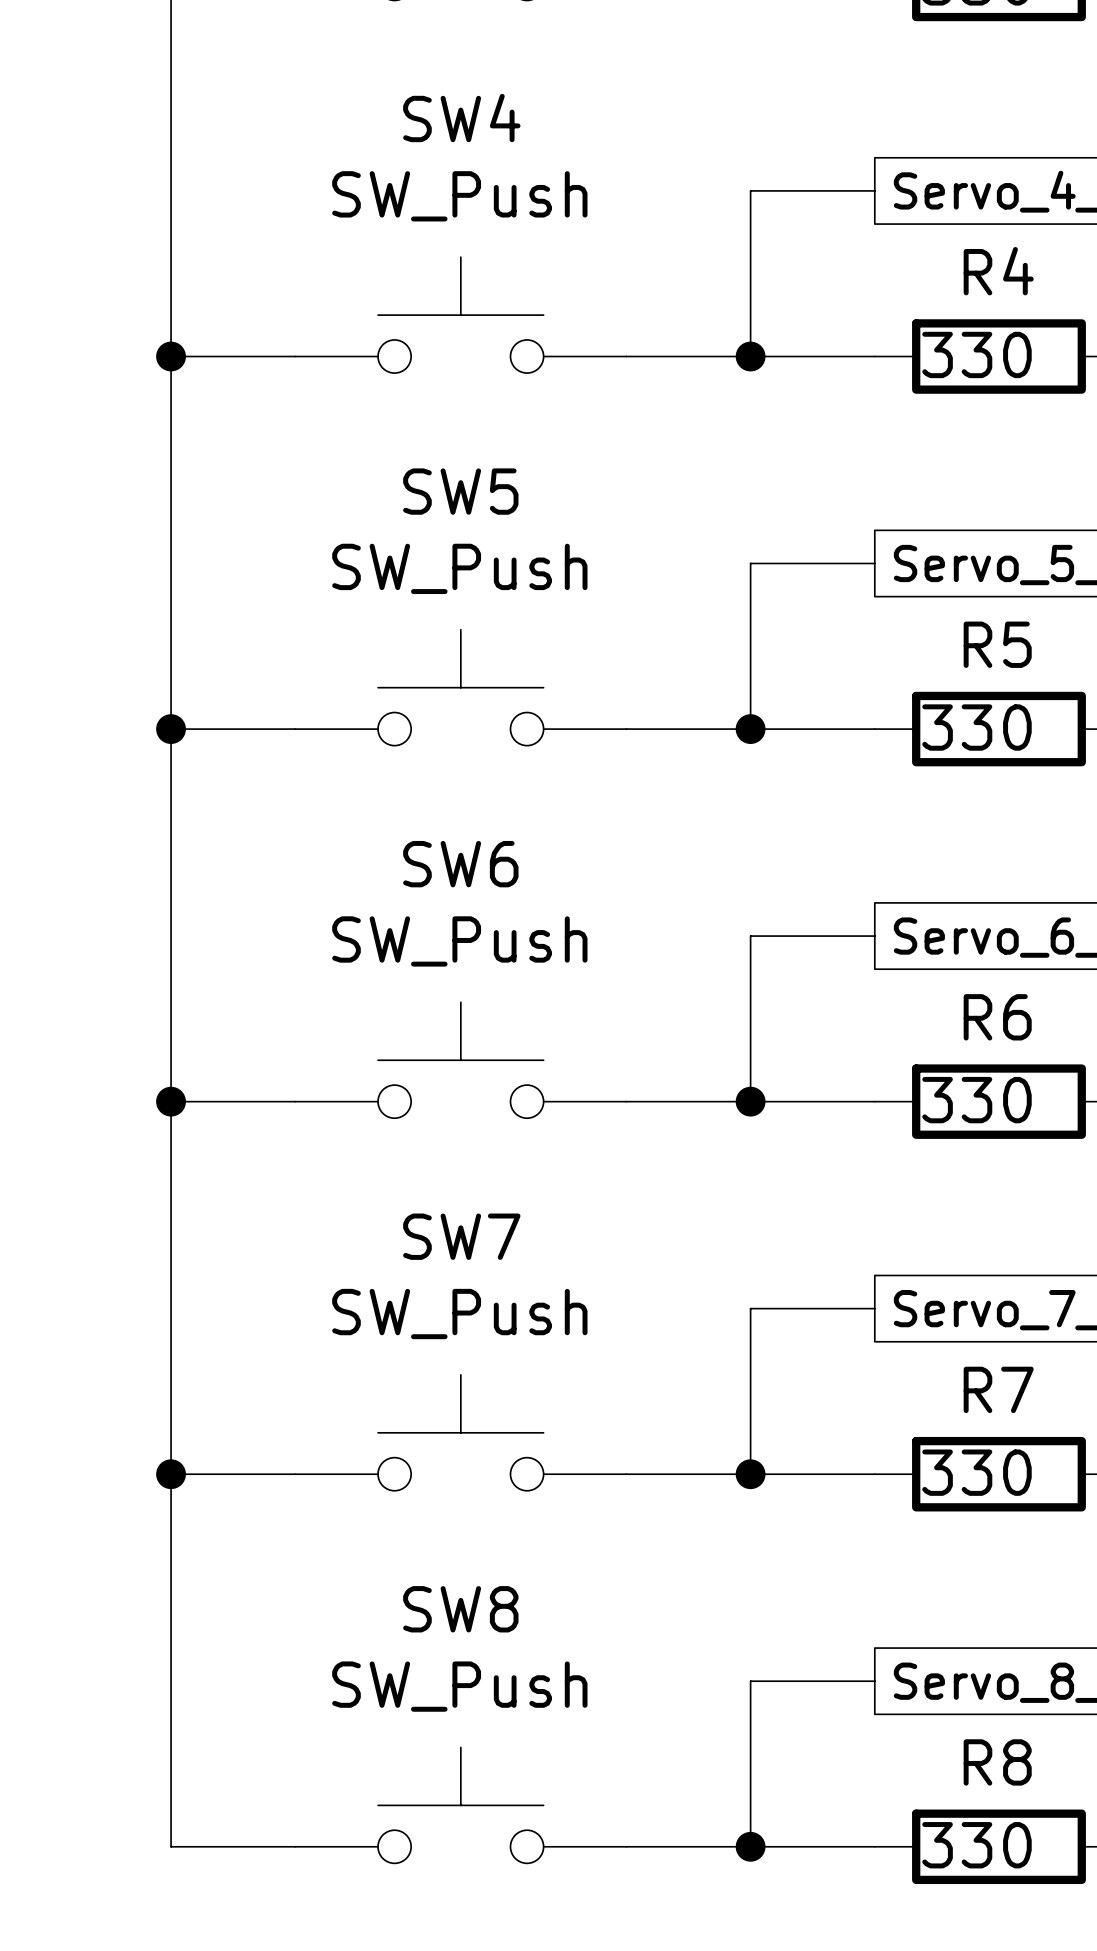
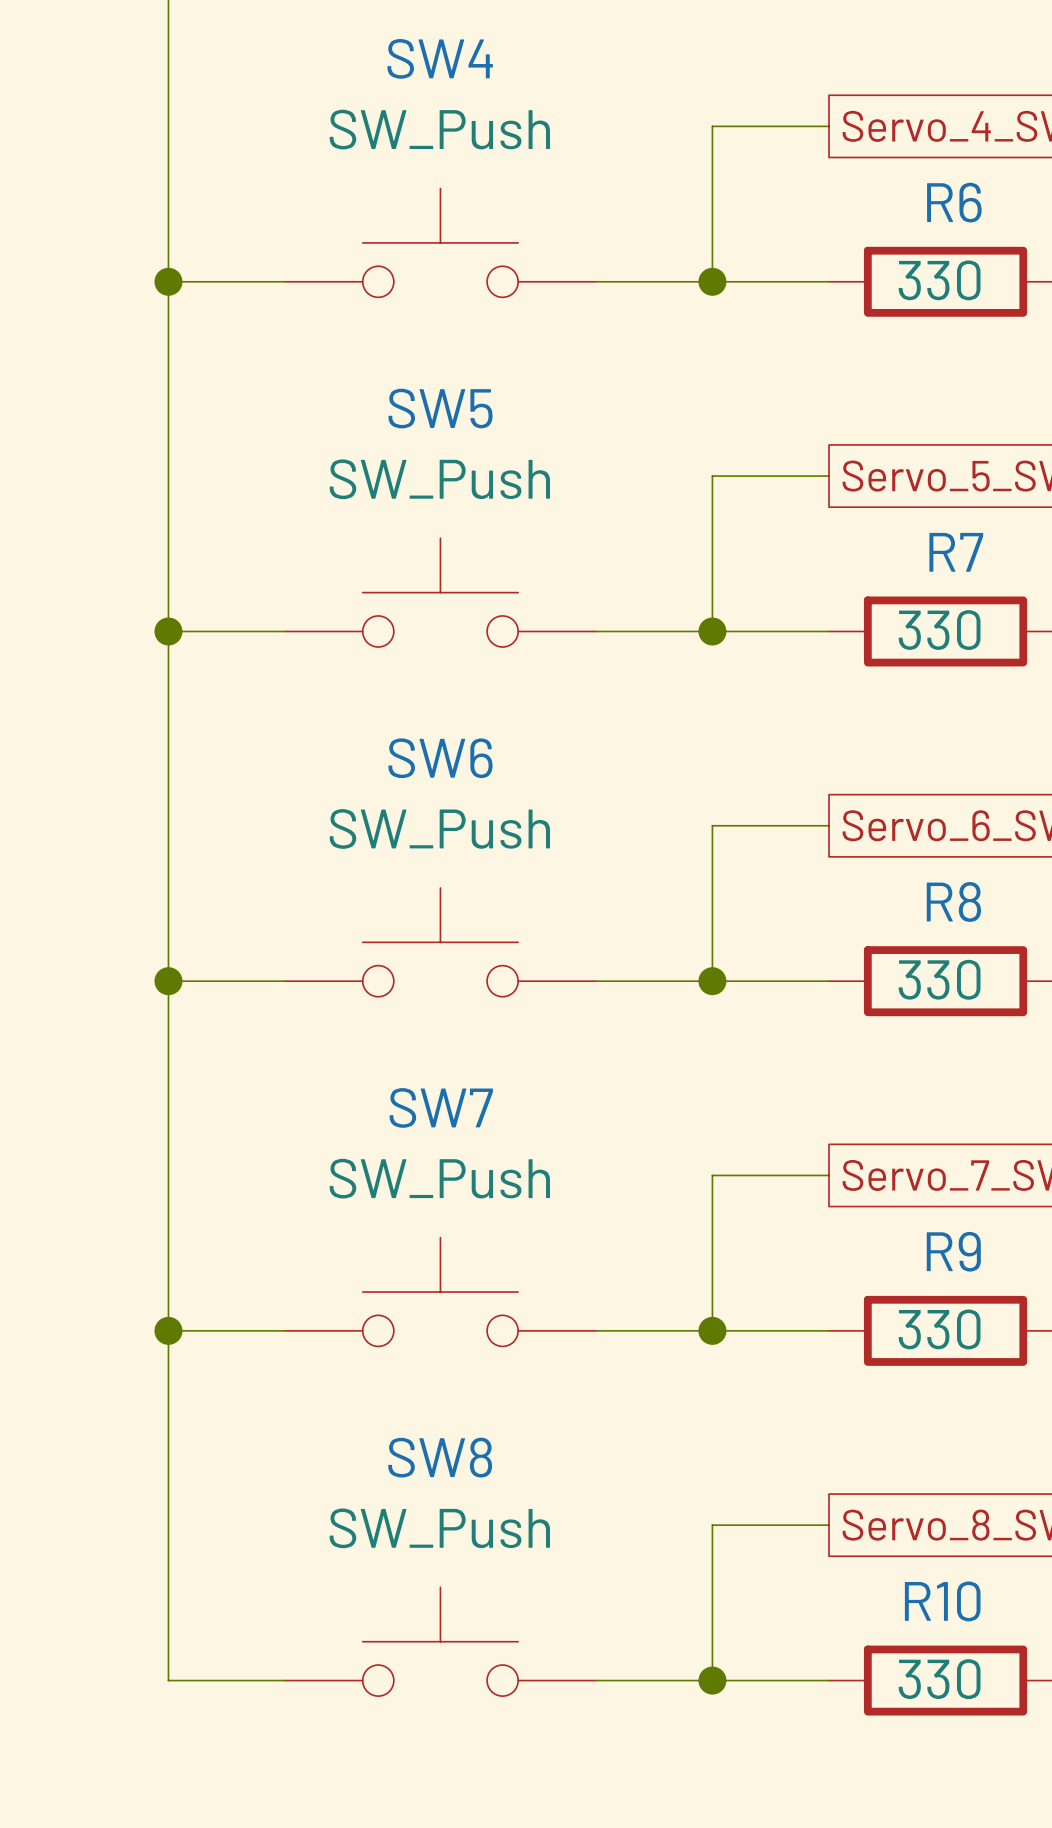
R4 name: R4 (998, 271) -> R6 (954, 202)
R5 name: R5 (997, 644) -> R7 (956, 552)
R6 name: R6 (997, 1017) -> R8 (953, 901)
R7 name: R7 (998, 1389) -> R9 (953, 1251)
R8 name: R8 (997, 1762) -> R10 (942, 1601)

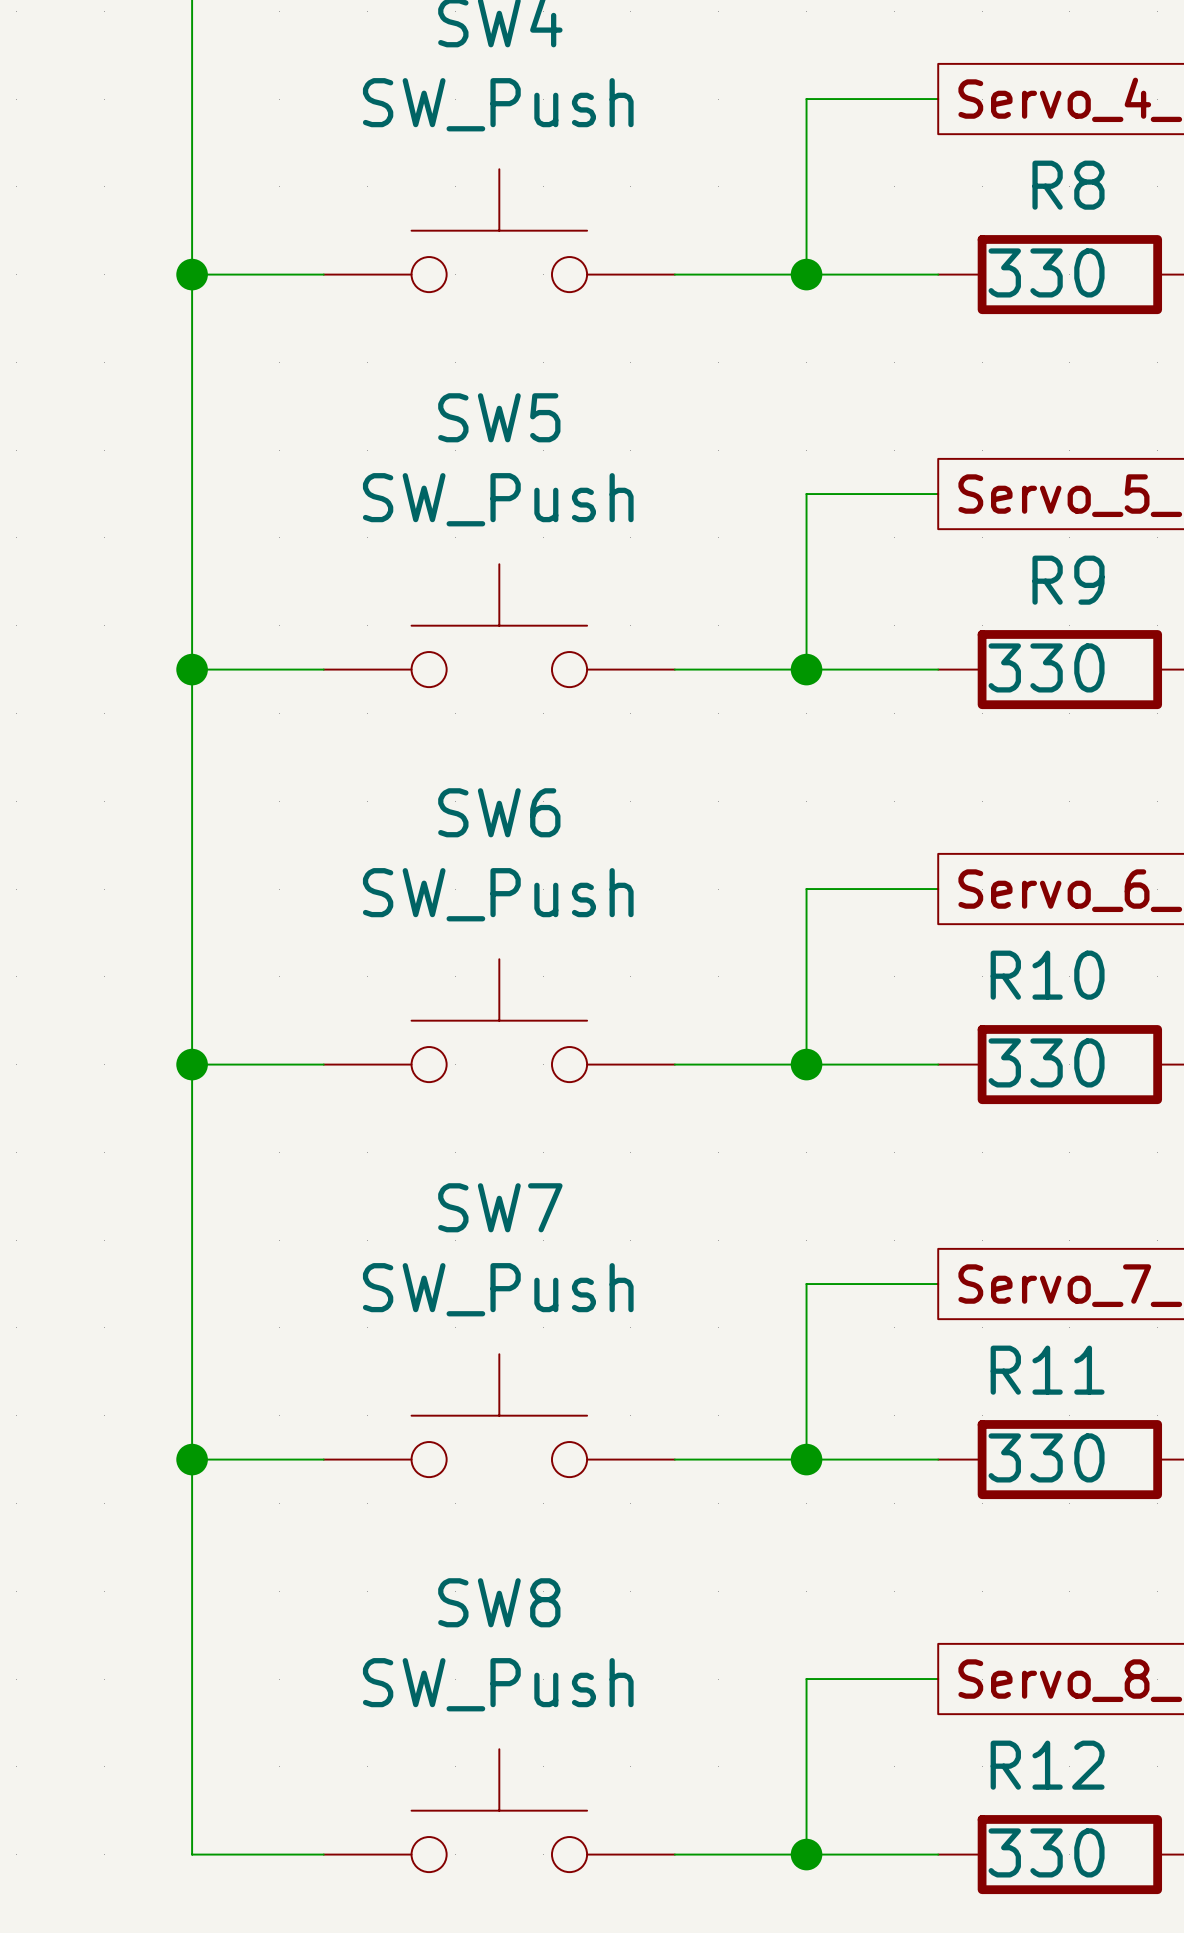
R6 name: R6 (954, 202) -> R8 (1068, 185)
R7 name: R7 (956, 552) -> R9 (1068, 580)
R8 name: R8 (953, 901) -> R10 (1047, 975)
R9 name: R9 (953, 1251) -> R11 (1047, 1370)
R10 name: R10 (942, 1601) -> R12 (1047, 1765)

